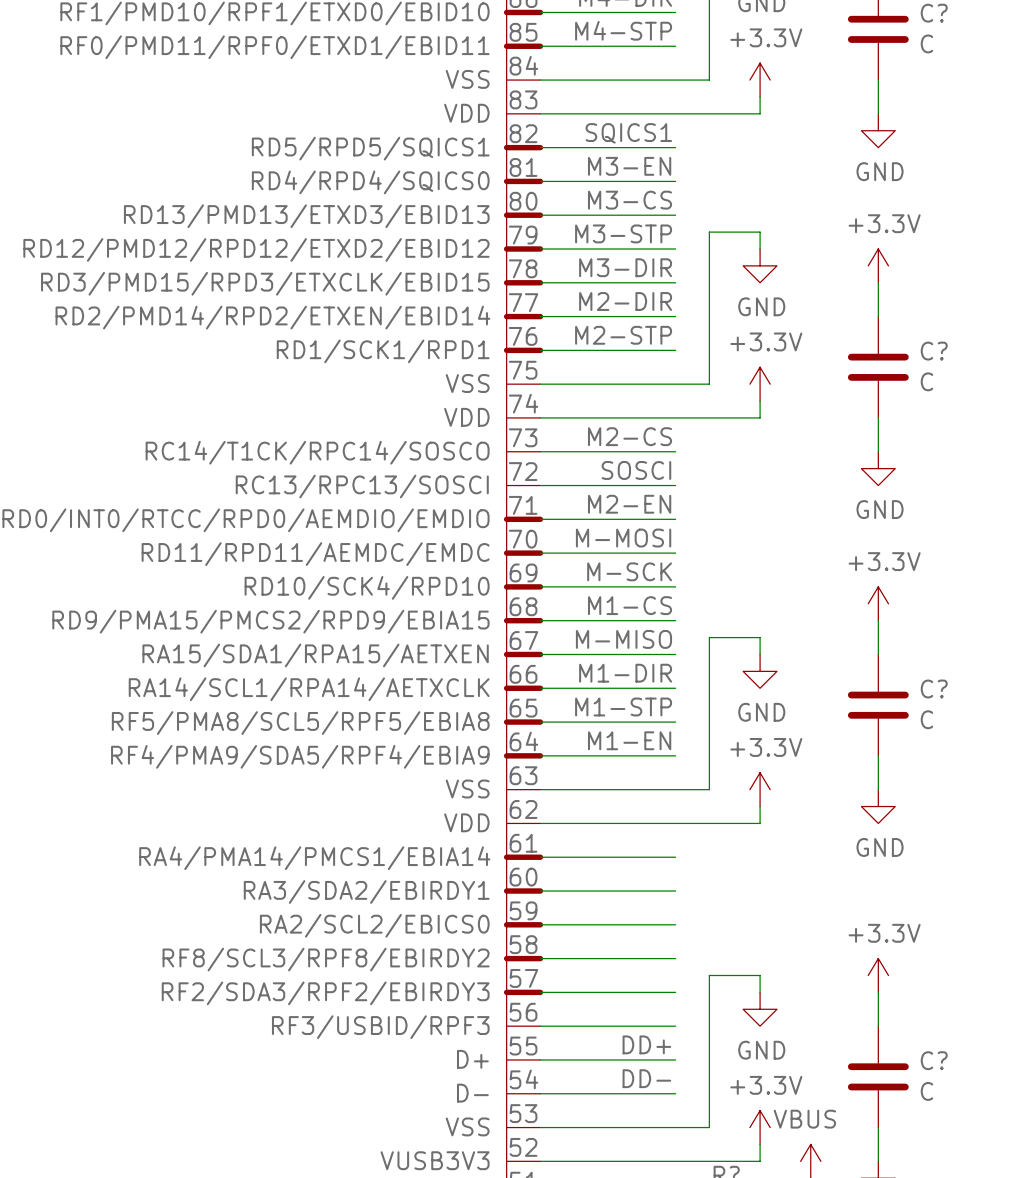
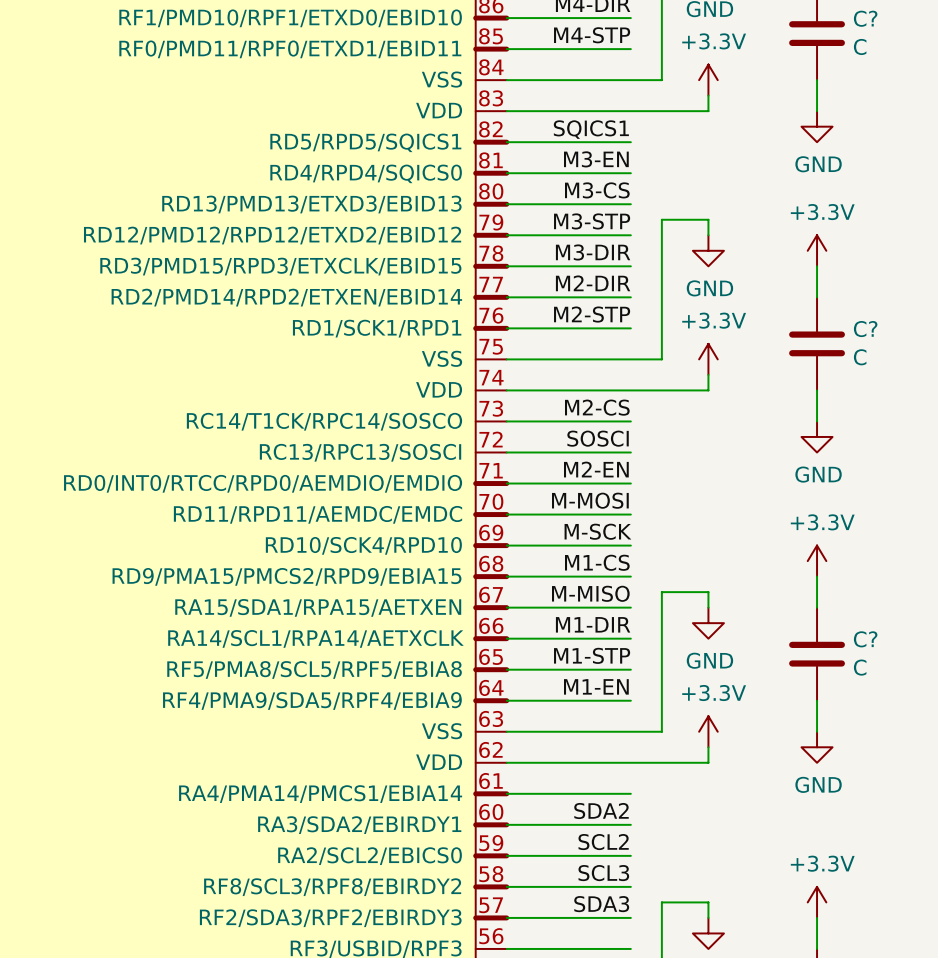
label: none -> SDA2 (601, 811)
label: none -> SCL2 (603, 842)
label: none -> SCL3 (603, 873)
label: none -> SDA3 (601, 904)

